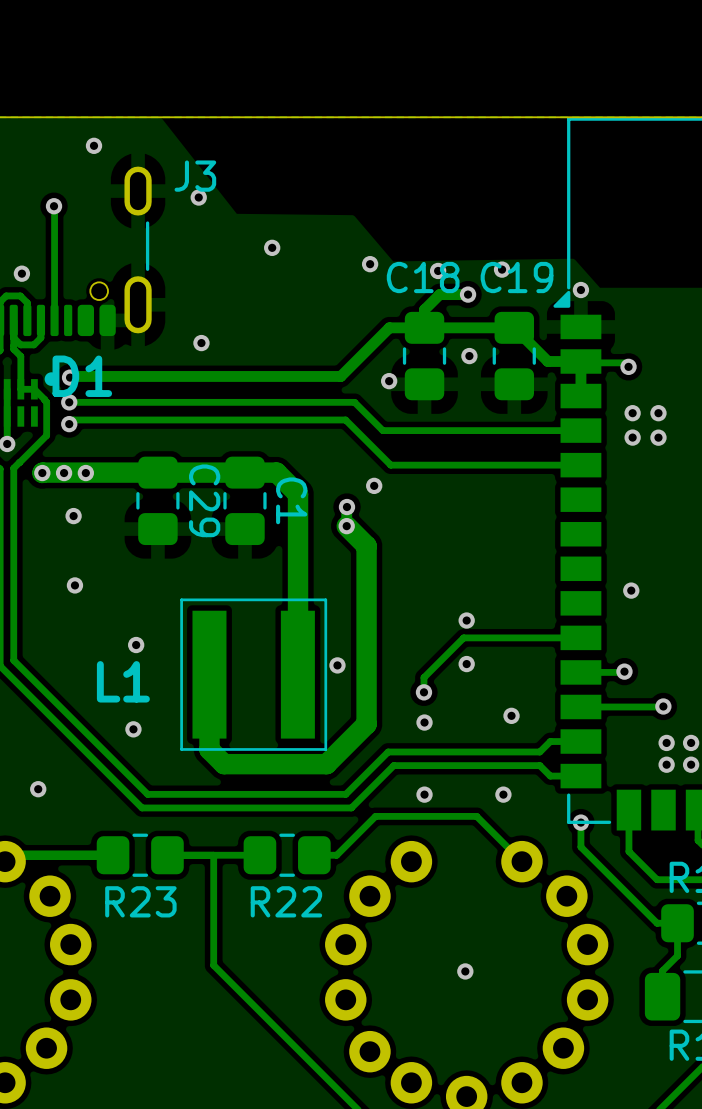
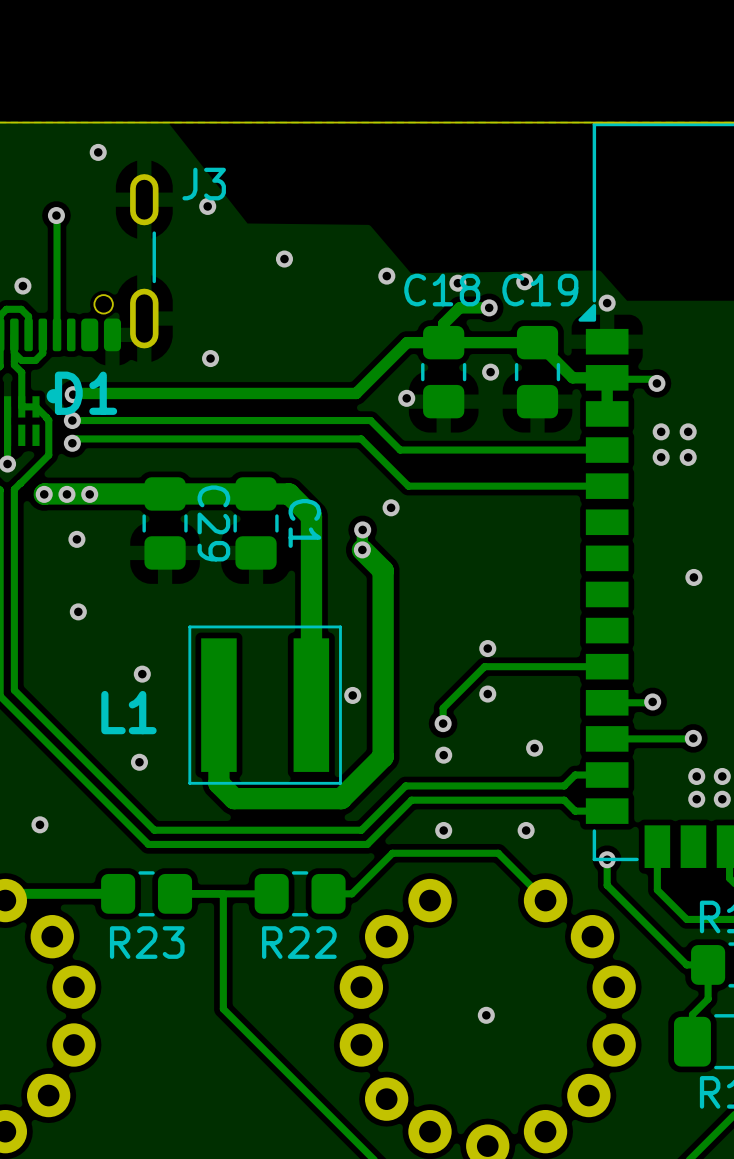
via position: (631, 590) -> (693, 577)

